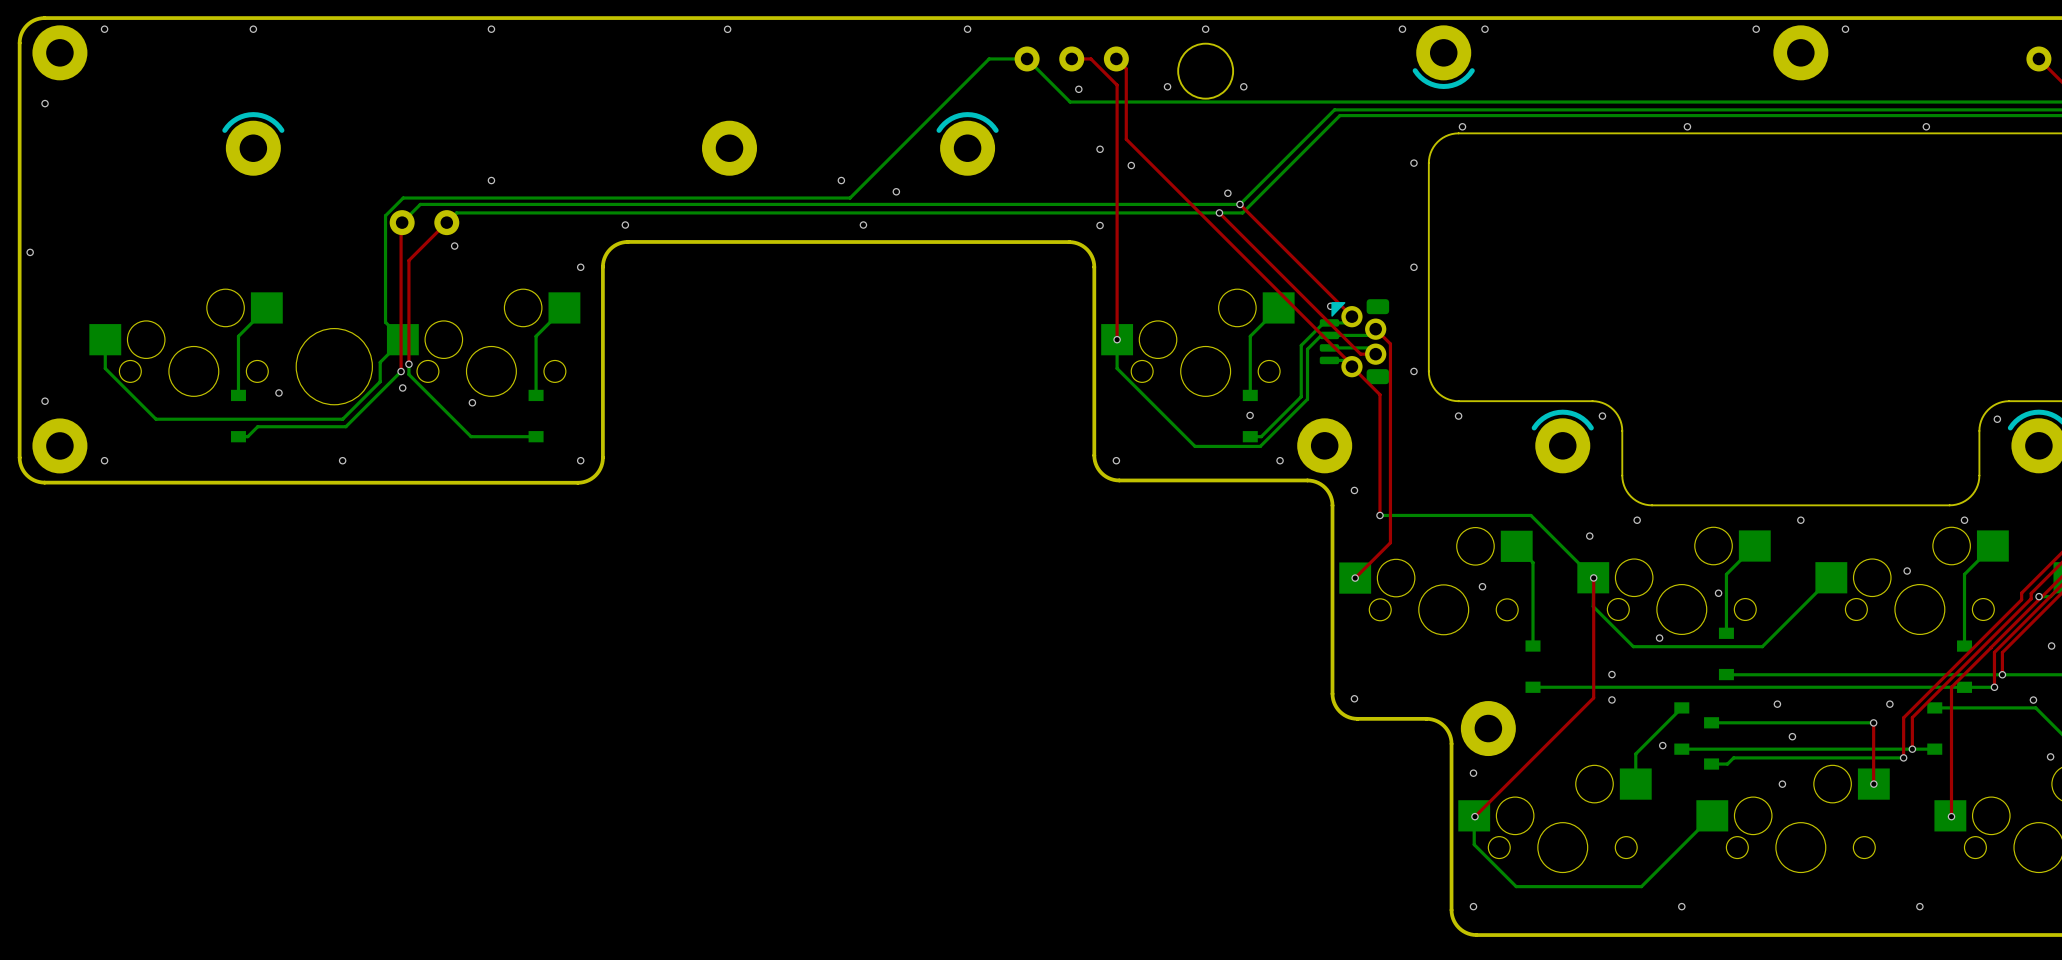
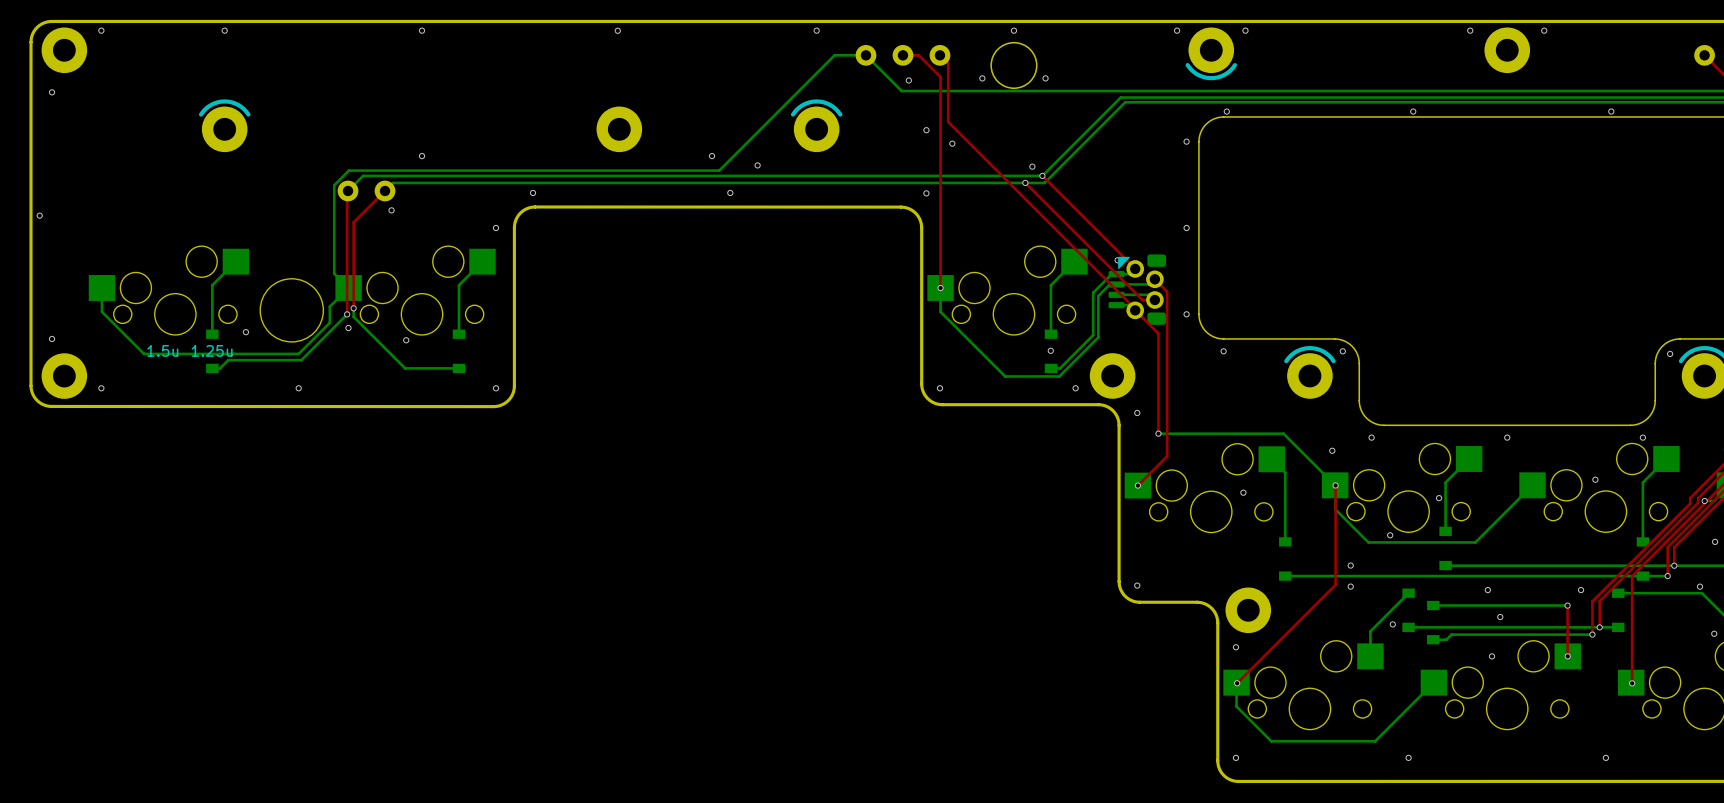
text: none -> 1.5u (162, 350)
text: none -> 1.25u (212, 350)

